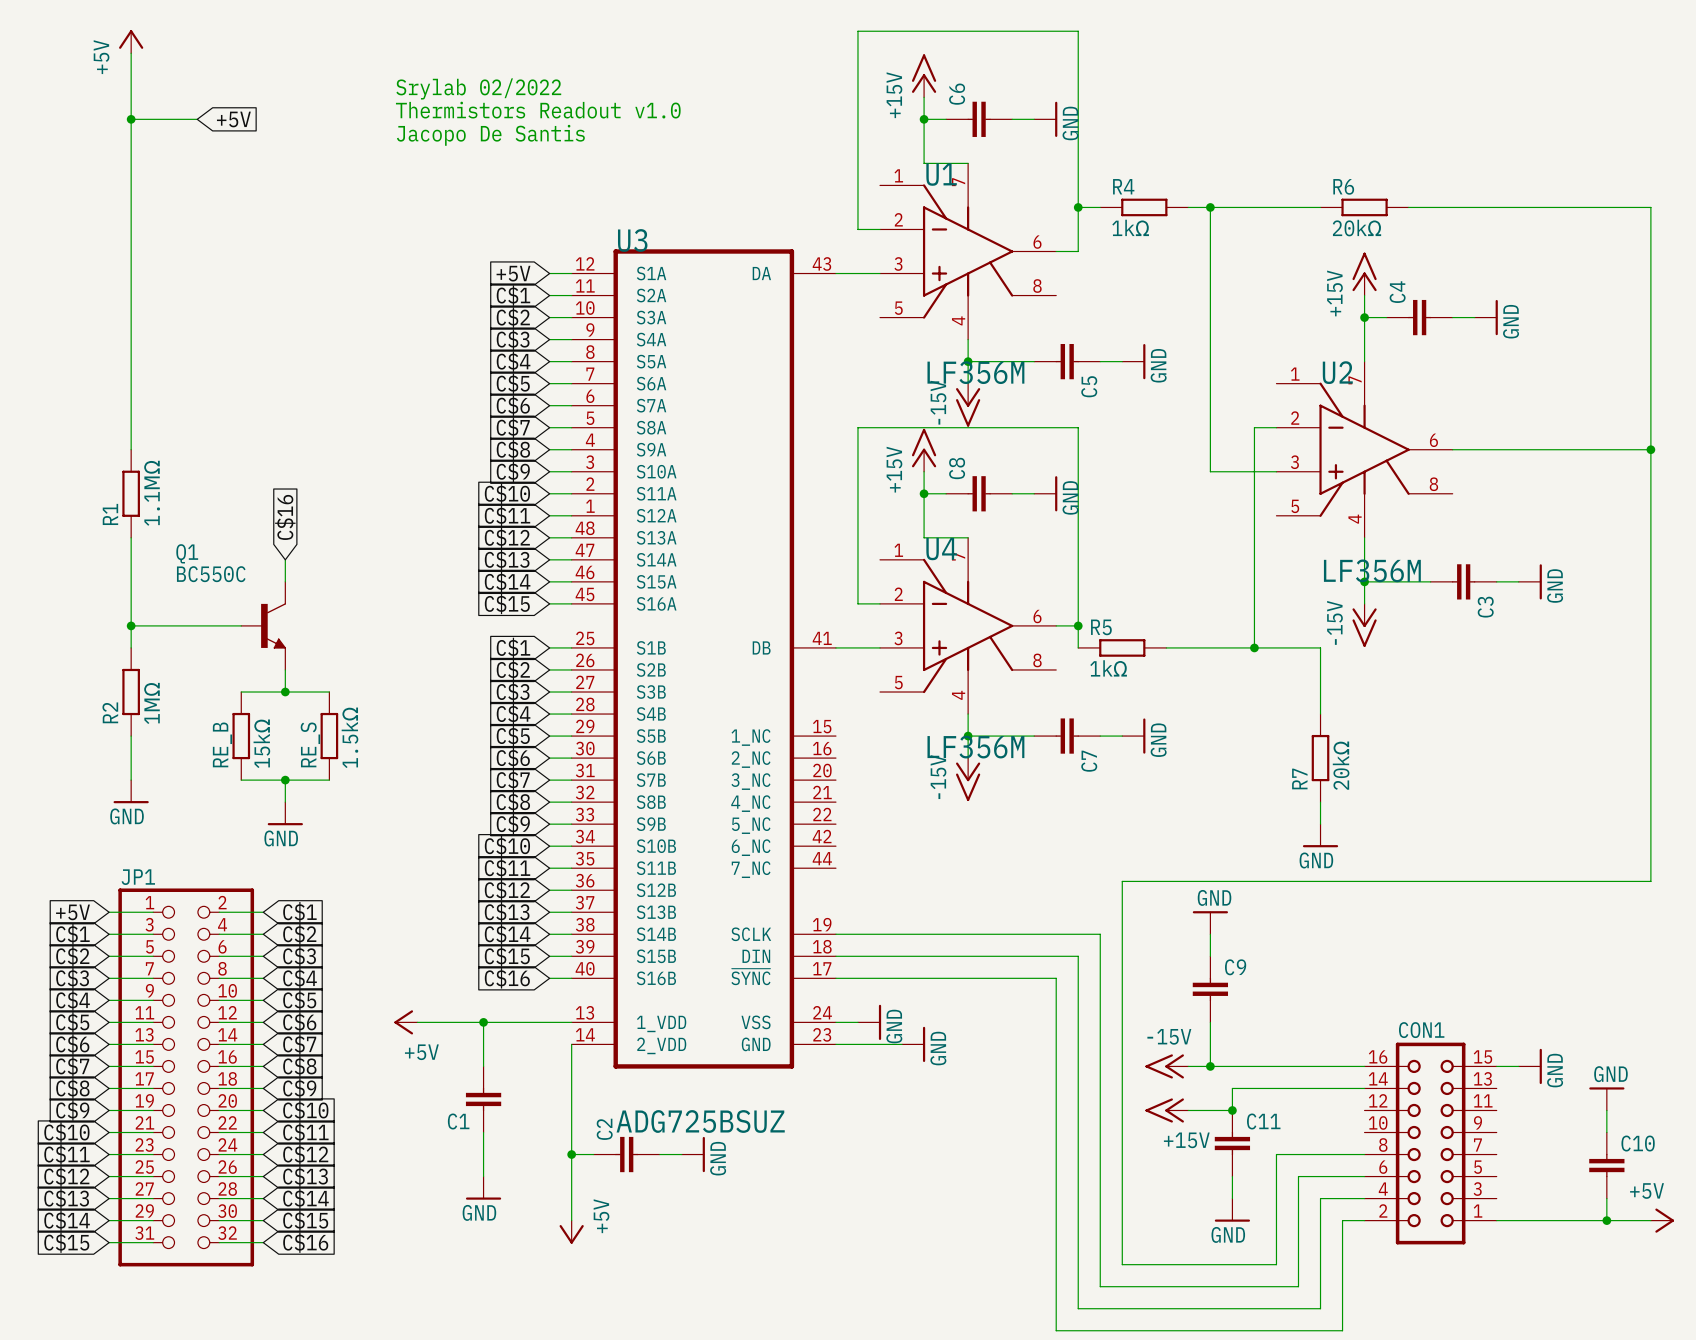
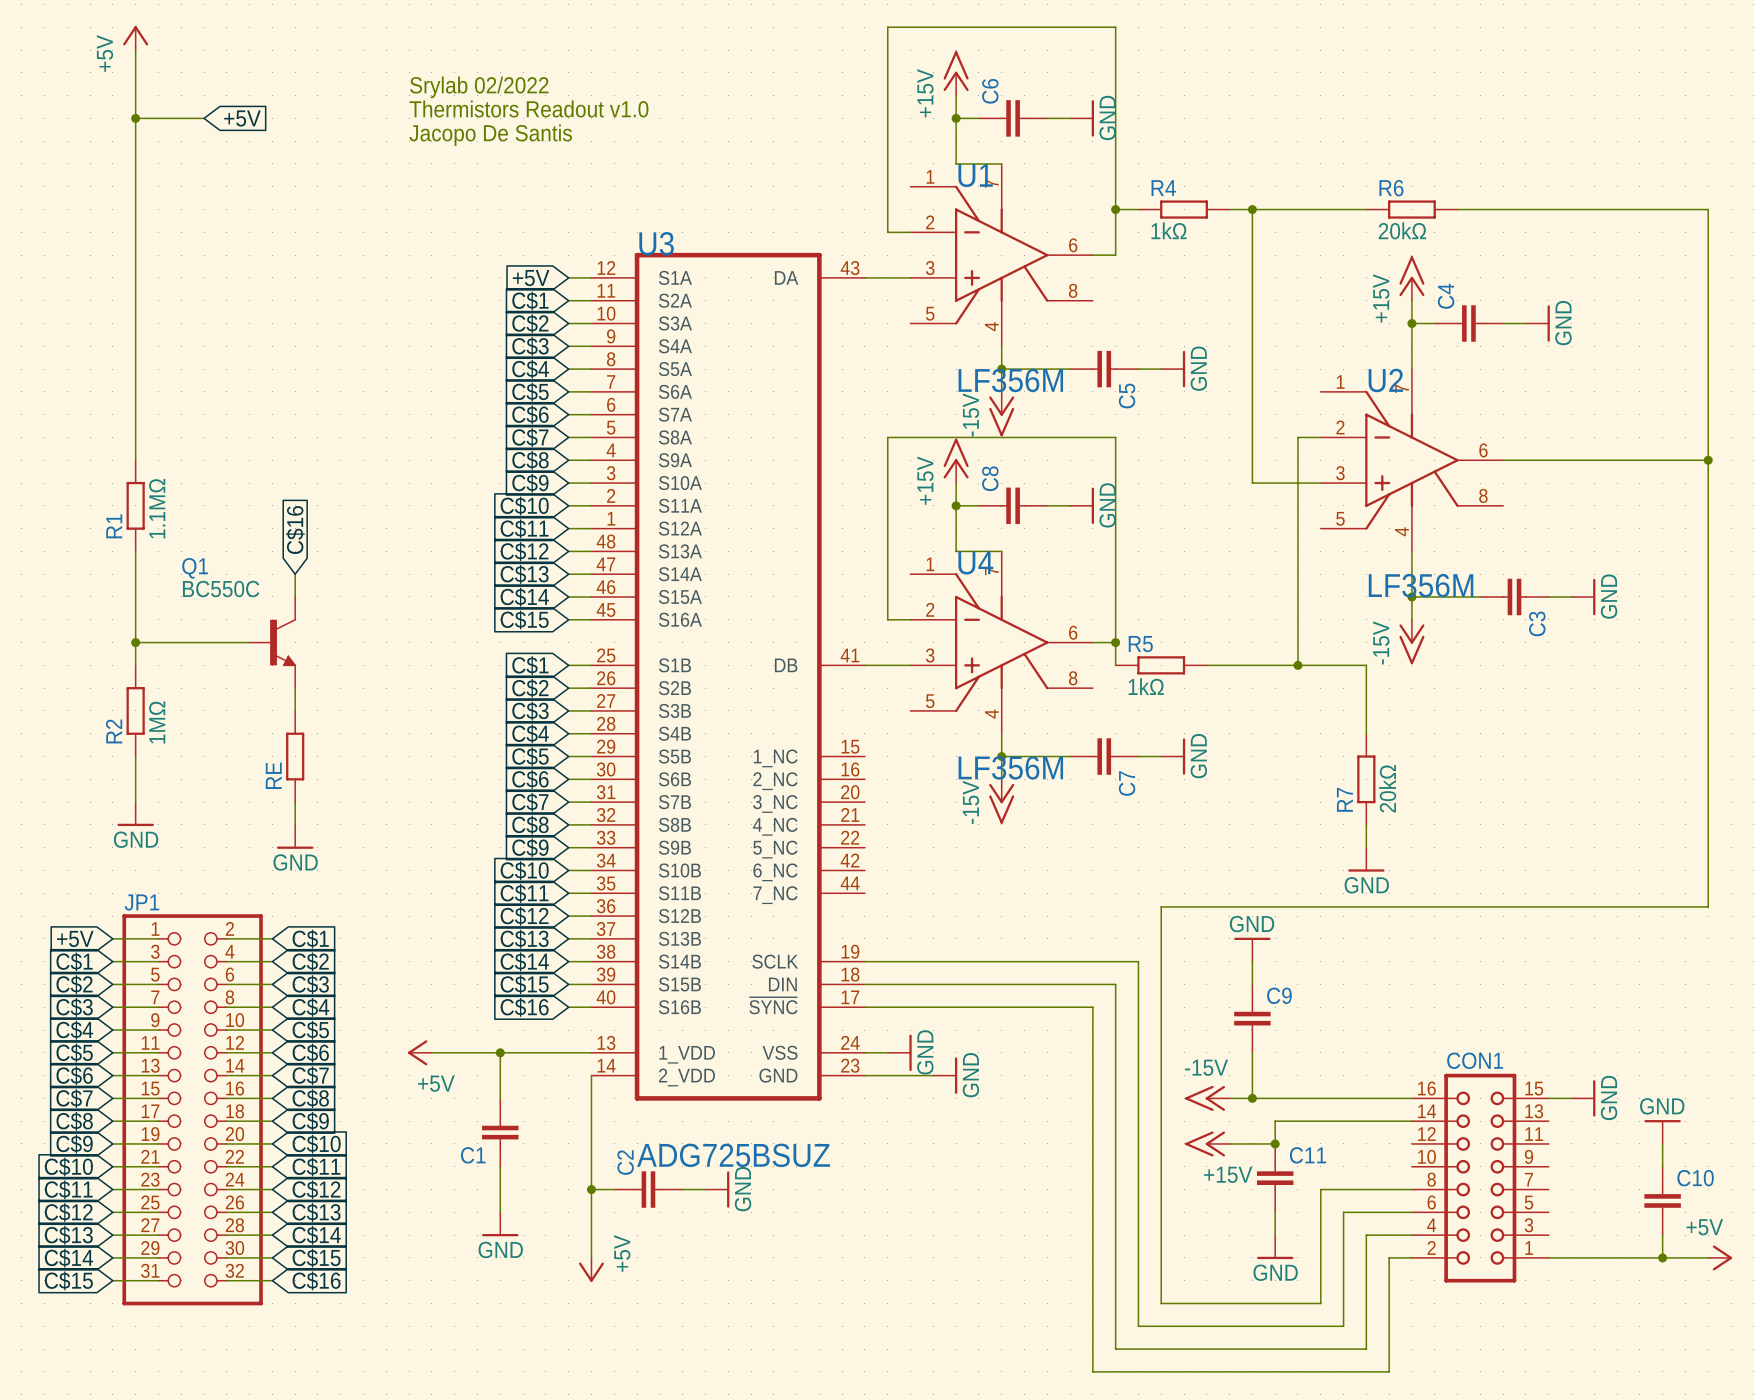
wire: (241, 692) (329, 692) -> none
junction: (285, 692) -> none
RE_B: 15kΩ (241, 736) -> none
RE: none -> (295, 756)
RE_S: 1.5kΩ (329, 736) -> none
wire: (241, 780) (329, 780) -> none
junction: (285, 780) -> none

